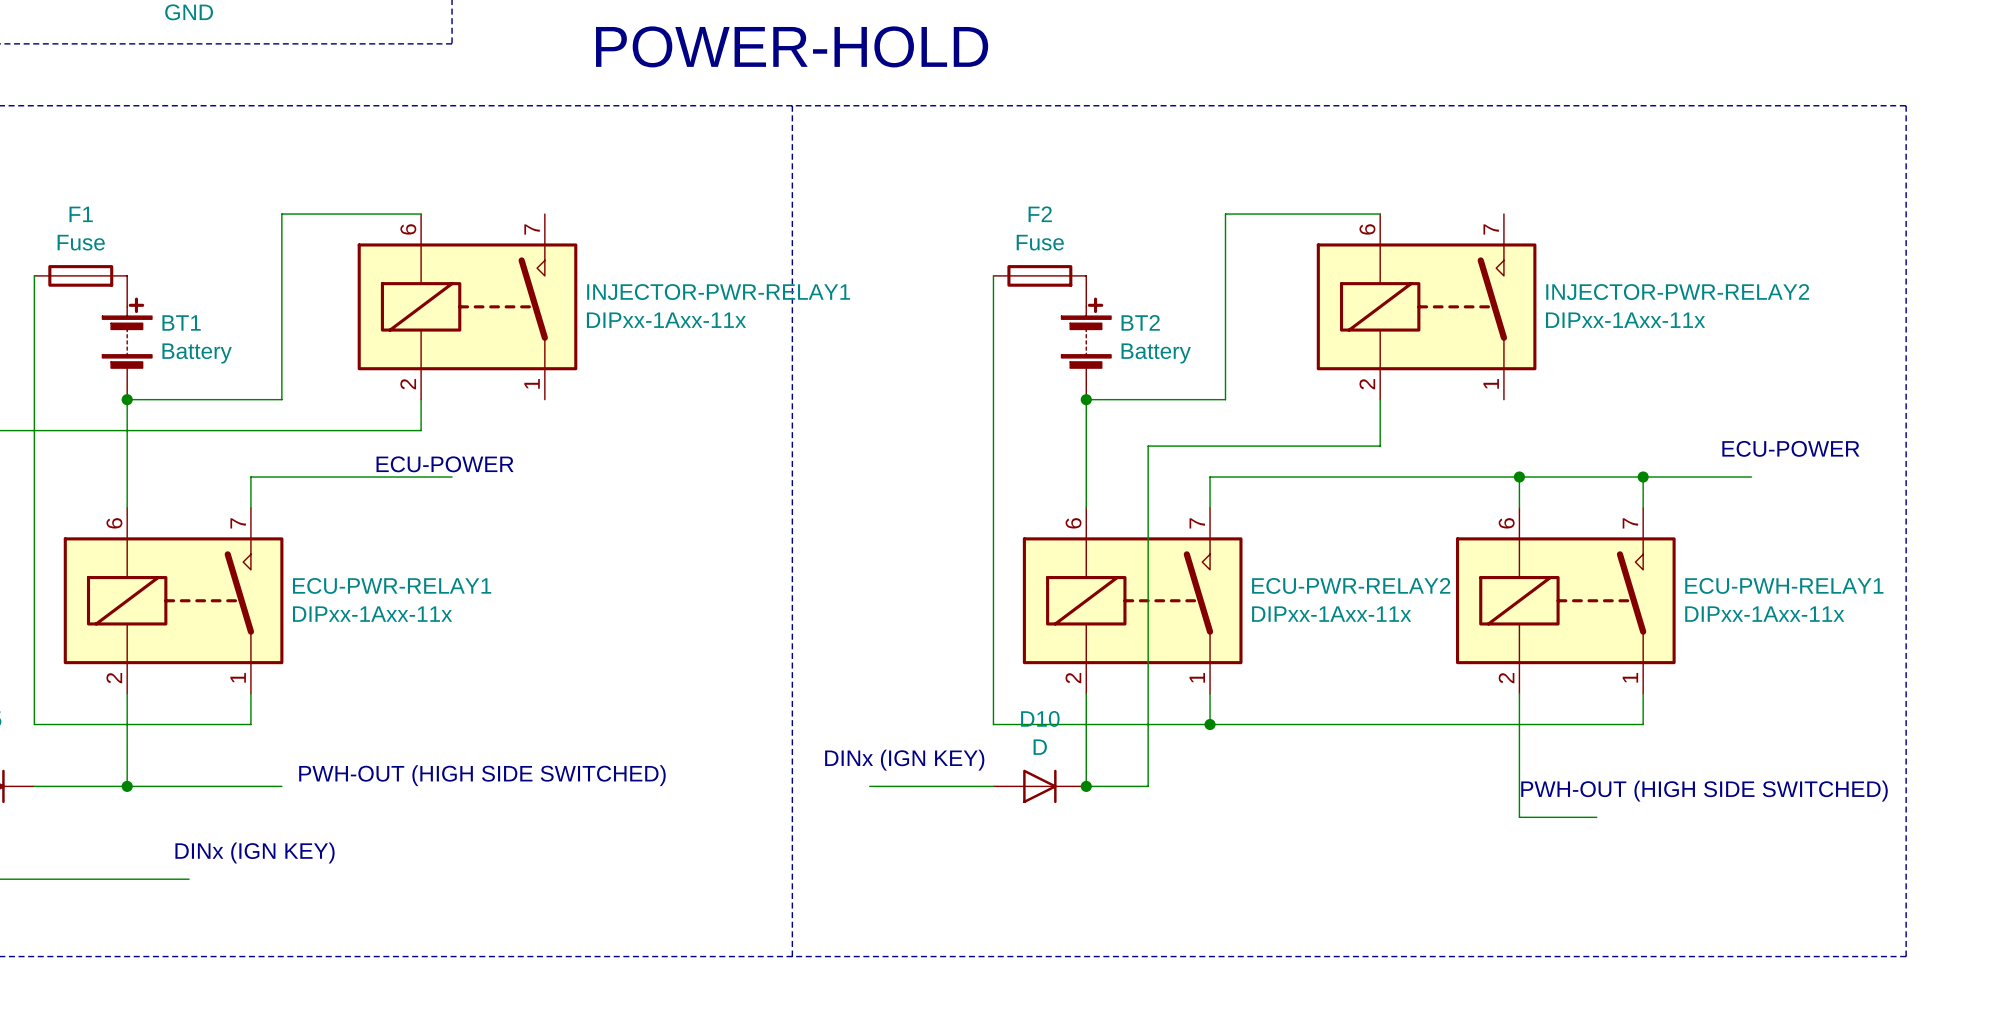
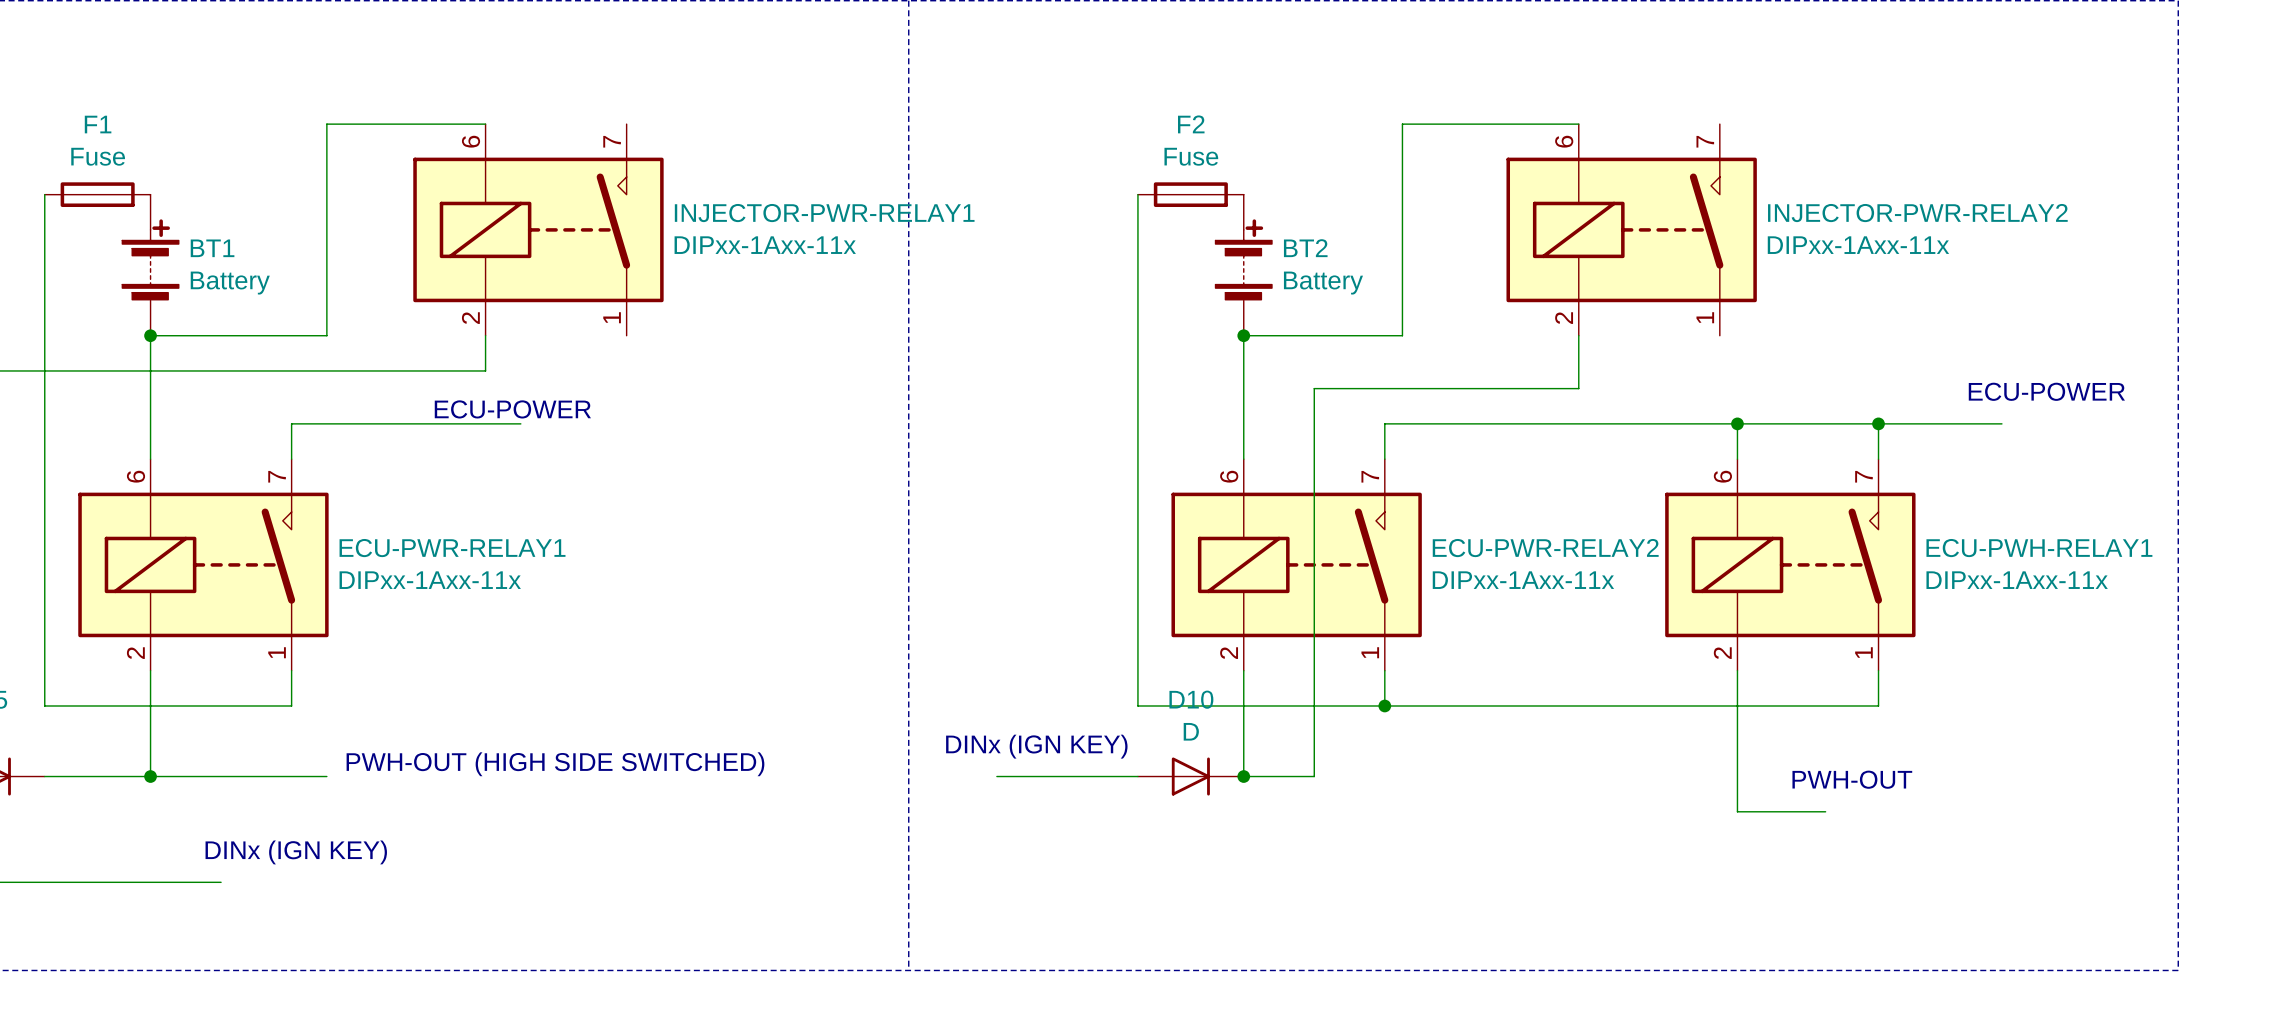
text: none -> PWH-OUT (1852, 779)
text: PWH-OUT (HIGH SIDE SWITCHED) (1704, 791) -> none

